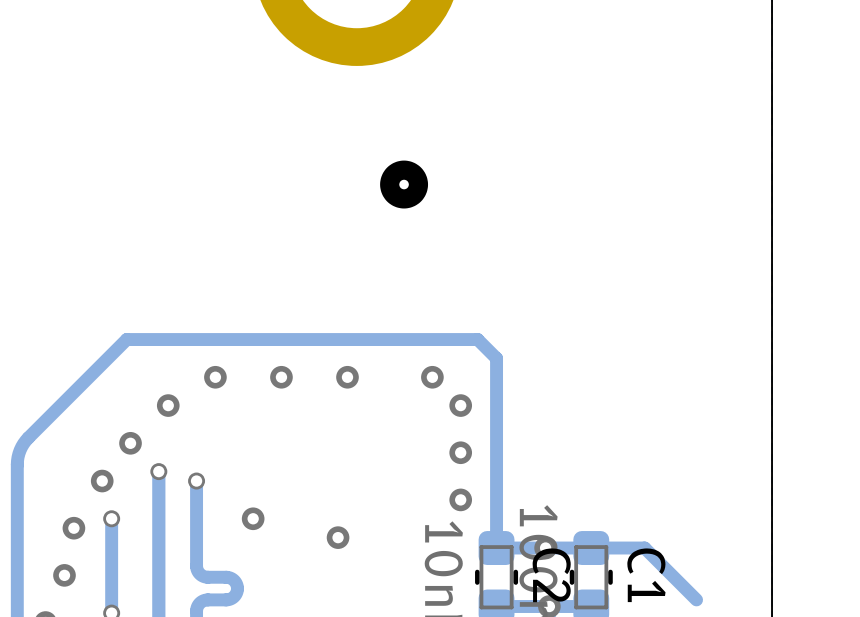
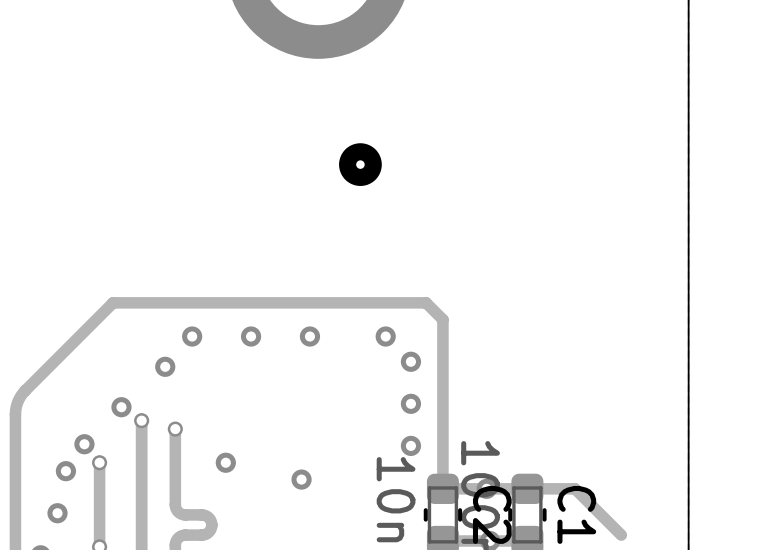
via position: (168, 405) -> (165, 366)
via position: (130, 443) -> (121, 407)
via position: (102, 481) -> (84, 444)

